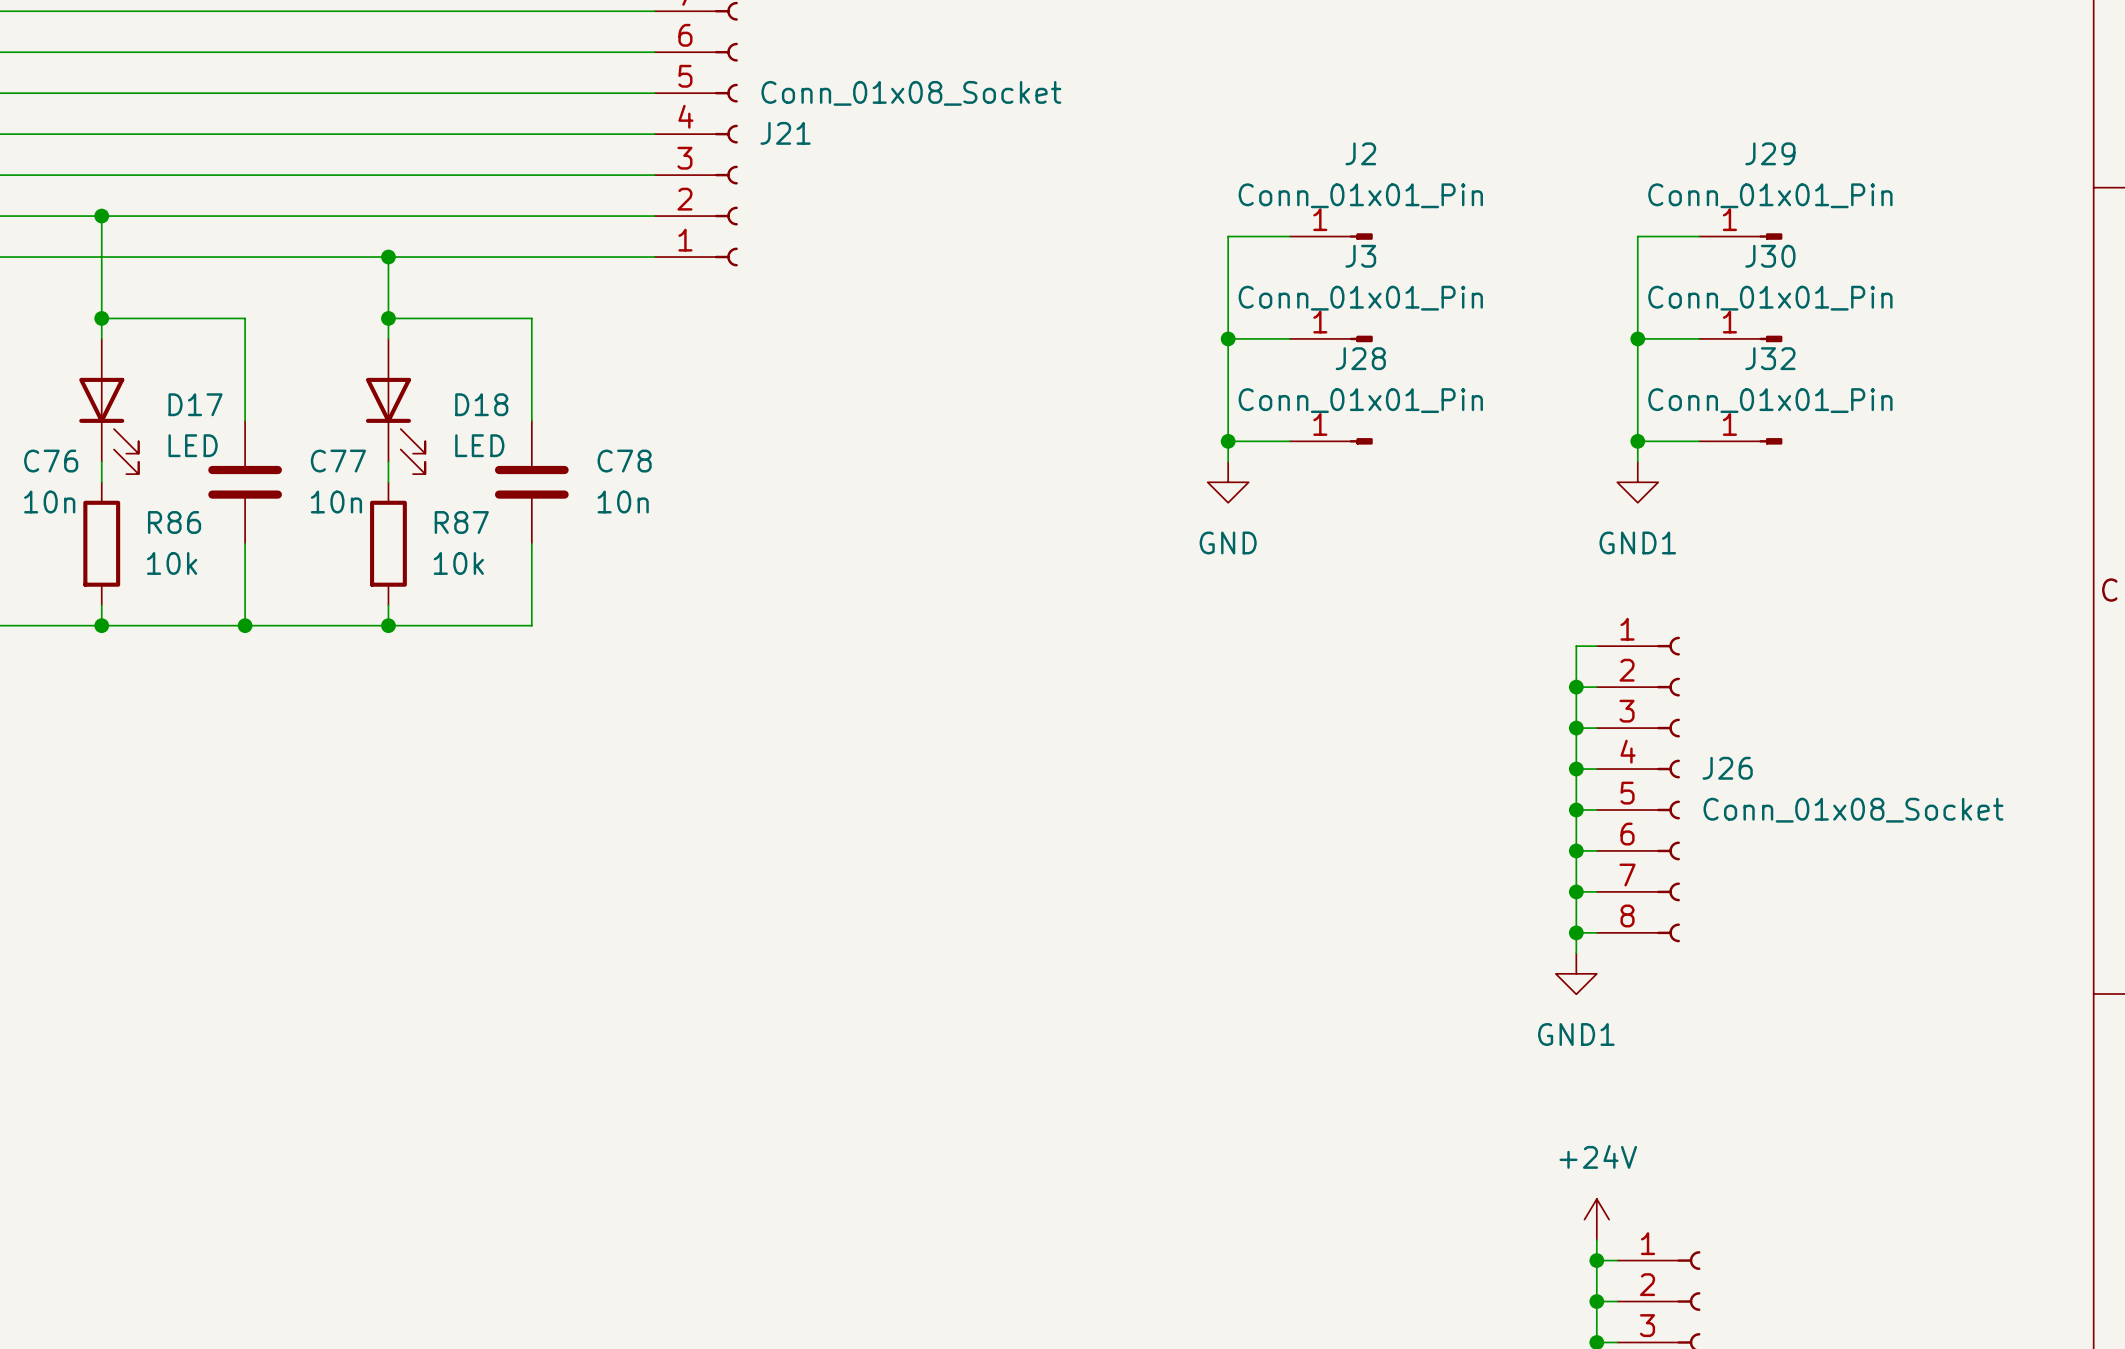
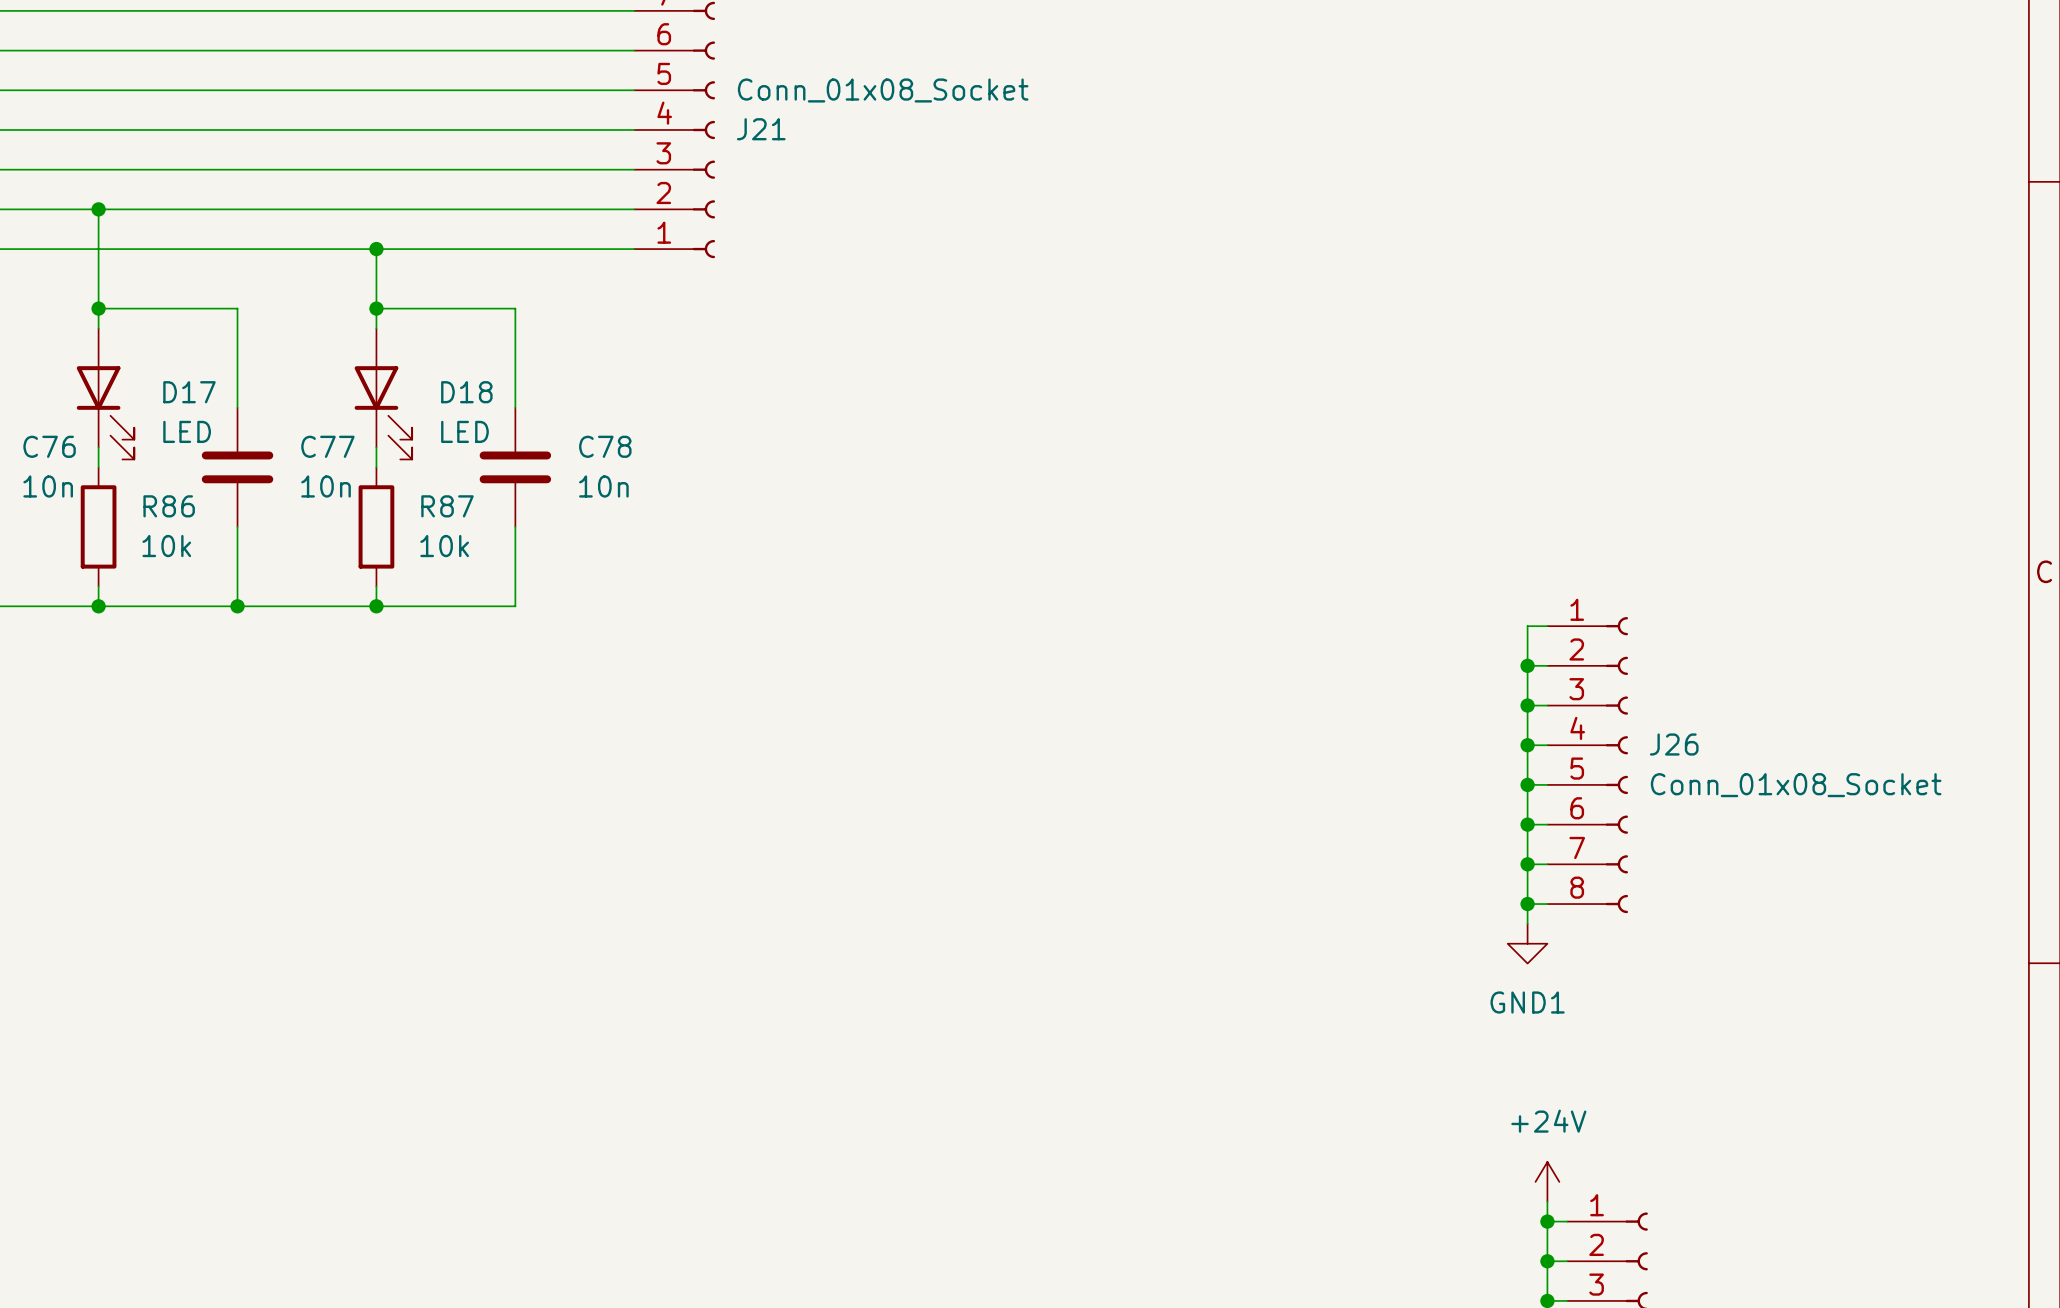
wire: (1289, 236) (1228, 236) (1228, 461) -> none
J2: Conn_01x01_Pin (1331, 236) -> none
wire: (1699, 236) (1637, 236) (1637, 461) -> none
J29: Conn_01x01_Pin (1740, 236) -> none
wire: (1228, 338) (1289, 338) -> none
junction: (1228, 338) -> none
J3: Conn_01x01_Pin (1331, 338) -> none
wire: (1637, 338) (1699, 338) -> none
junction: (1637, 338) -> none
J30: Conn_01x01_Pin (1740, 338) -> none
wire: (1228, 441) (1289, 441) -> none
junction: (1228, 441) -> none
J28: Conn_01x01_Pin (1331, 441) -> none
wire: (1637, 441) (1699, 441) -> none
junction: (1637, 441) -> none
J32: Conn_01x01_Pin (1740, 441) -> none
power symbol: GND (1228, 482) -> none
power symbol: GND1 (1637, 482) -> none

